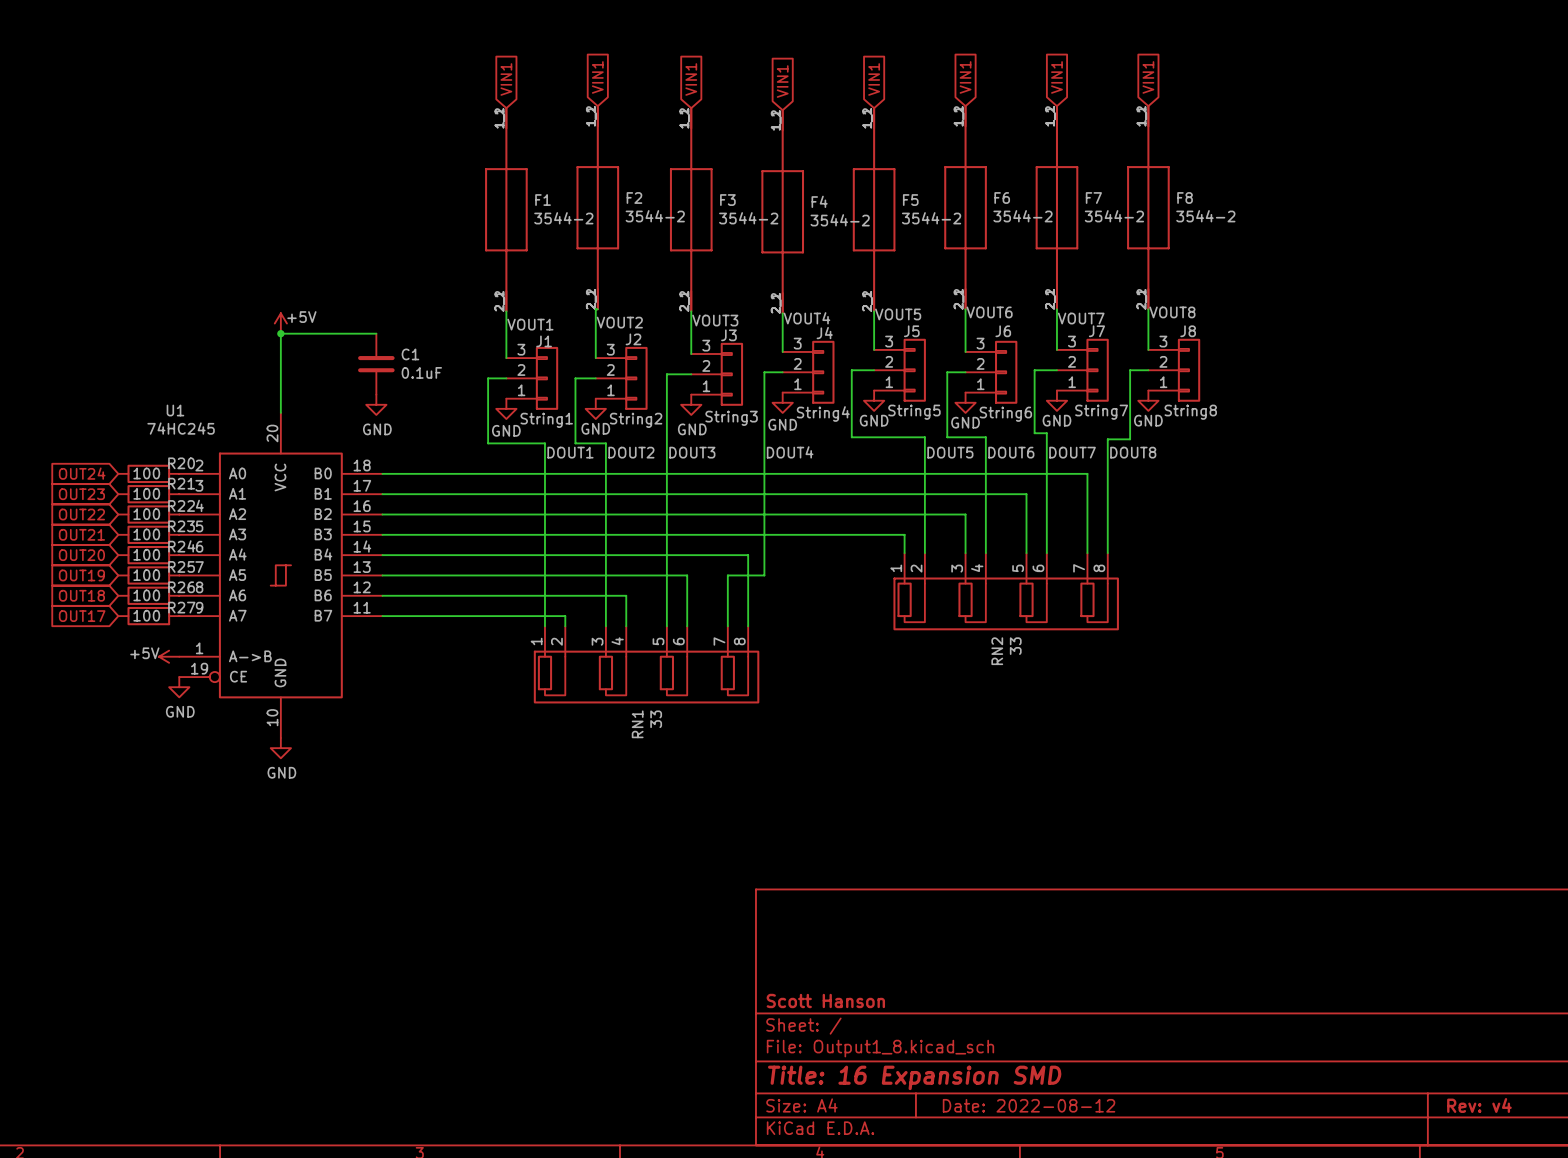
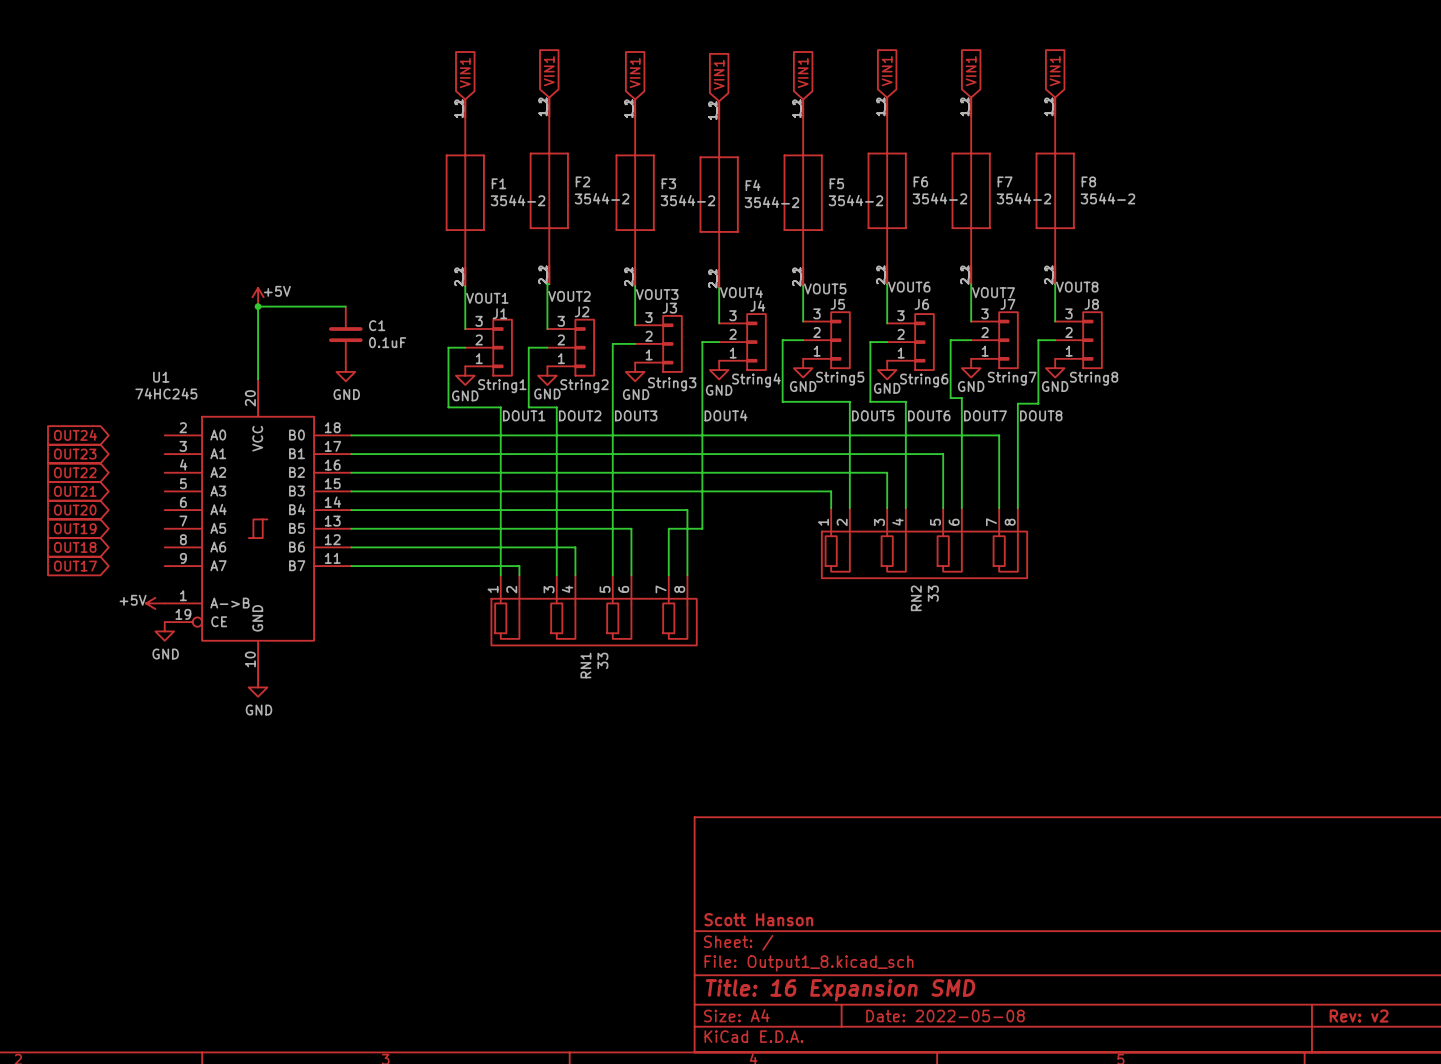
R20: 100 (148, 473) -> none
R21: 100 (148, 494) -> none
R22: 100 (148, 514) -> none
R23: 100 (148, 534) -> none
R24: 100 (148, 555) -> none
R25: 100 (148, 575) -> none
R26: 100 (148, 595) -> none
R27: 100 (148, 616) -> none
title block: Date: 2022-08-12 (1029, 1105) -> Date: 2022-05-08 (945, 1016)
title block: Rev: v4 (1479, 1105) -> Rev: v2 (1359, 1016)

